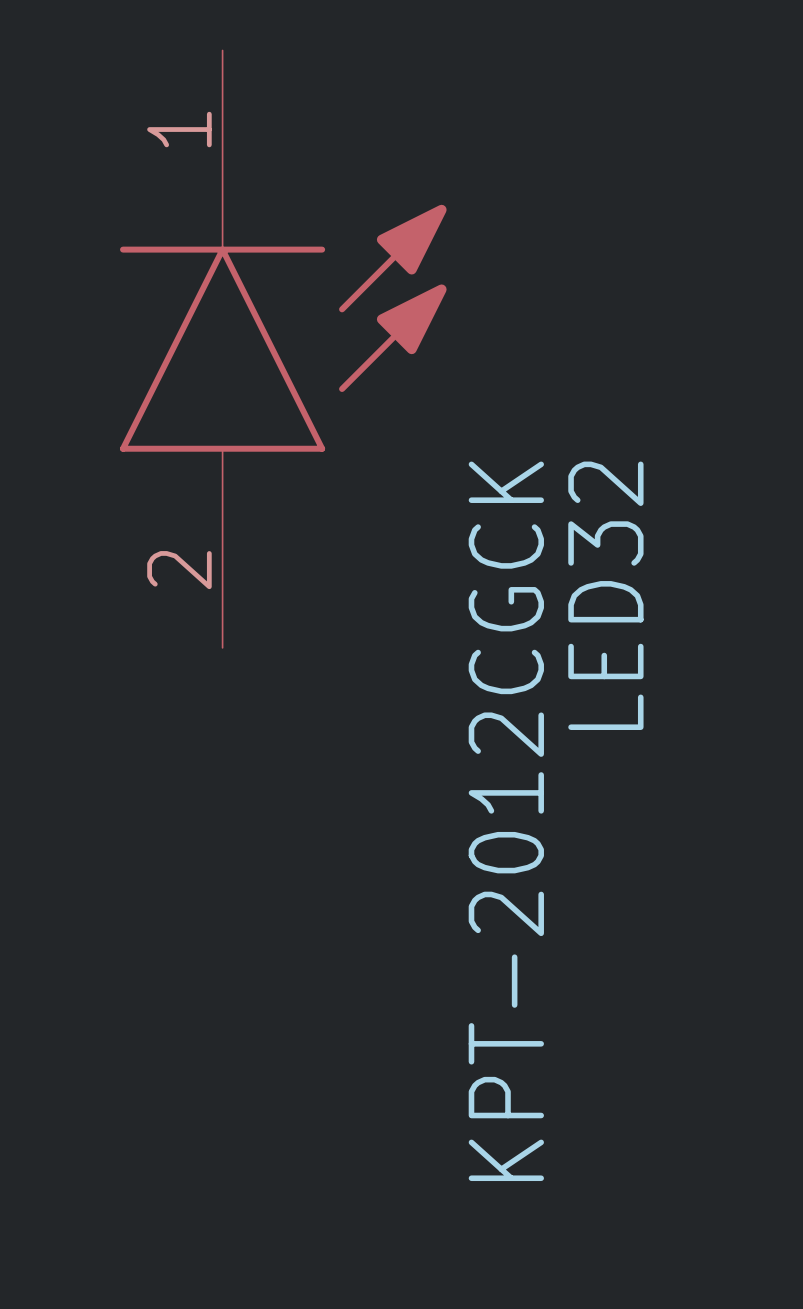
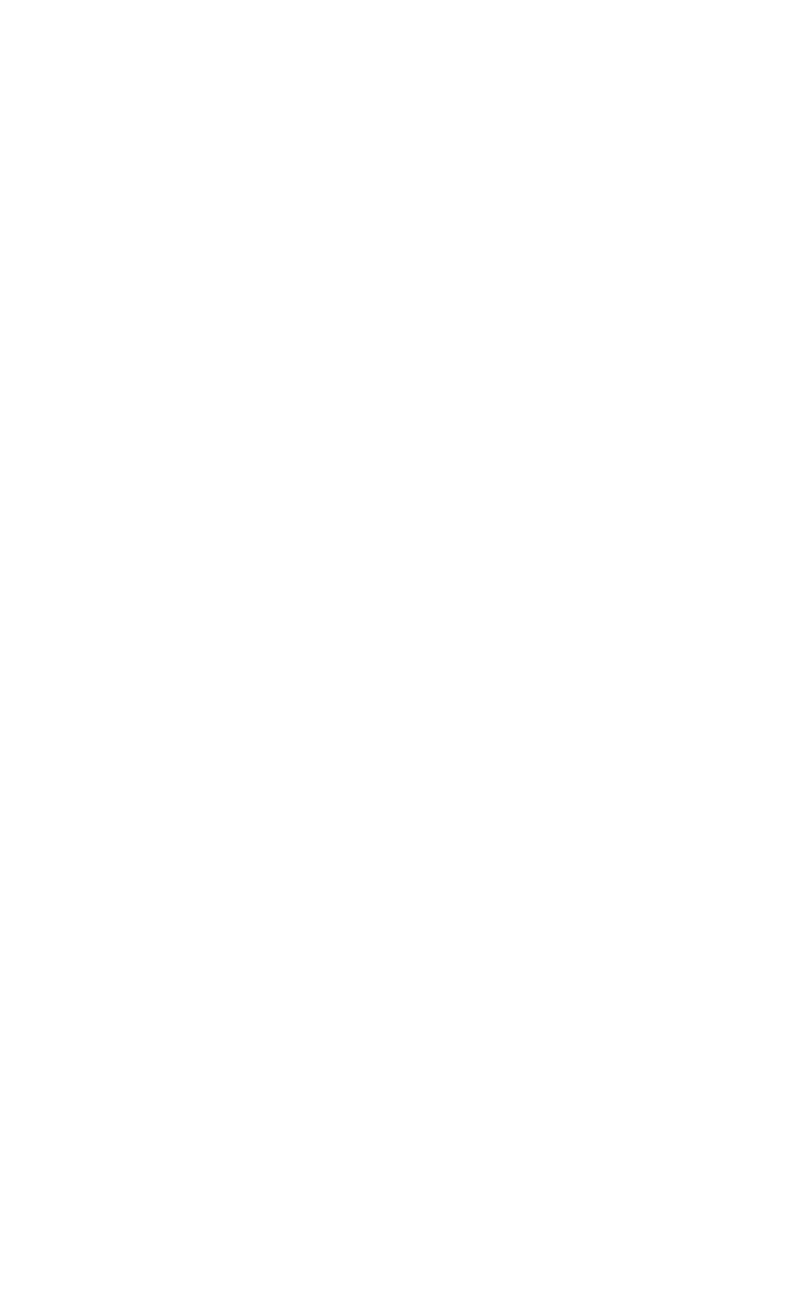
LED32: KPT-2012CGCK (283, 349) -> none

